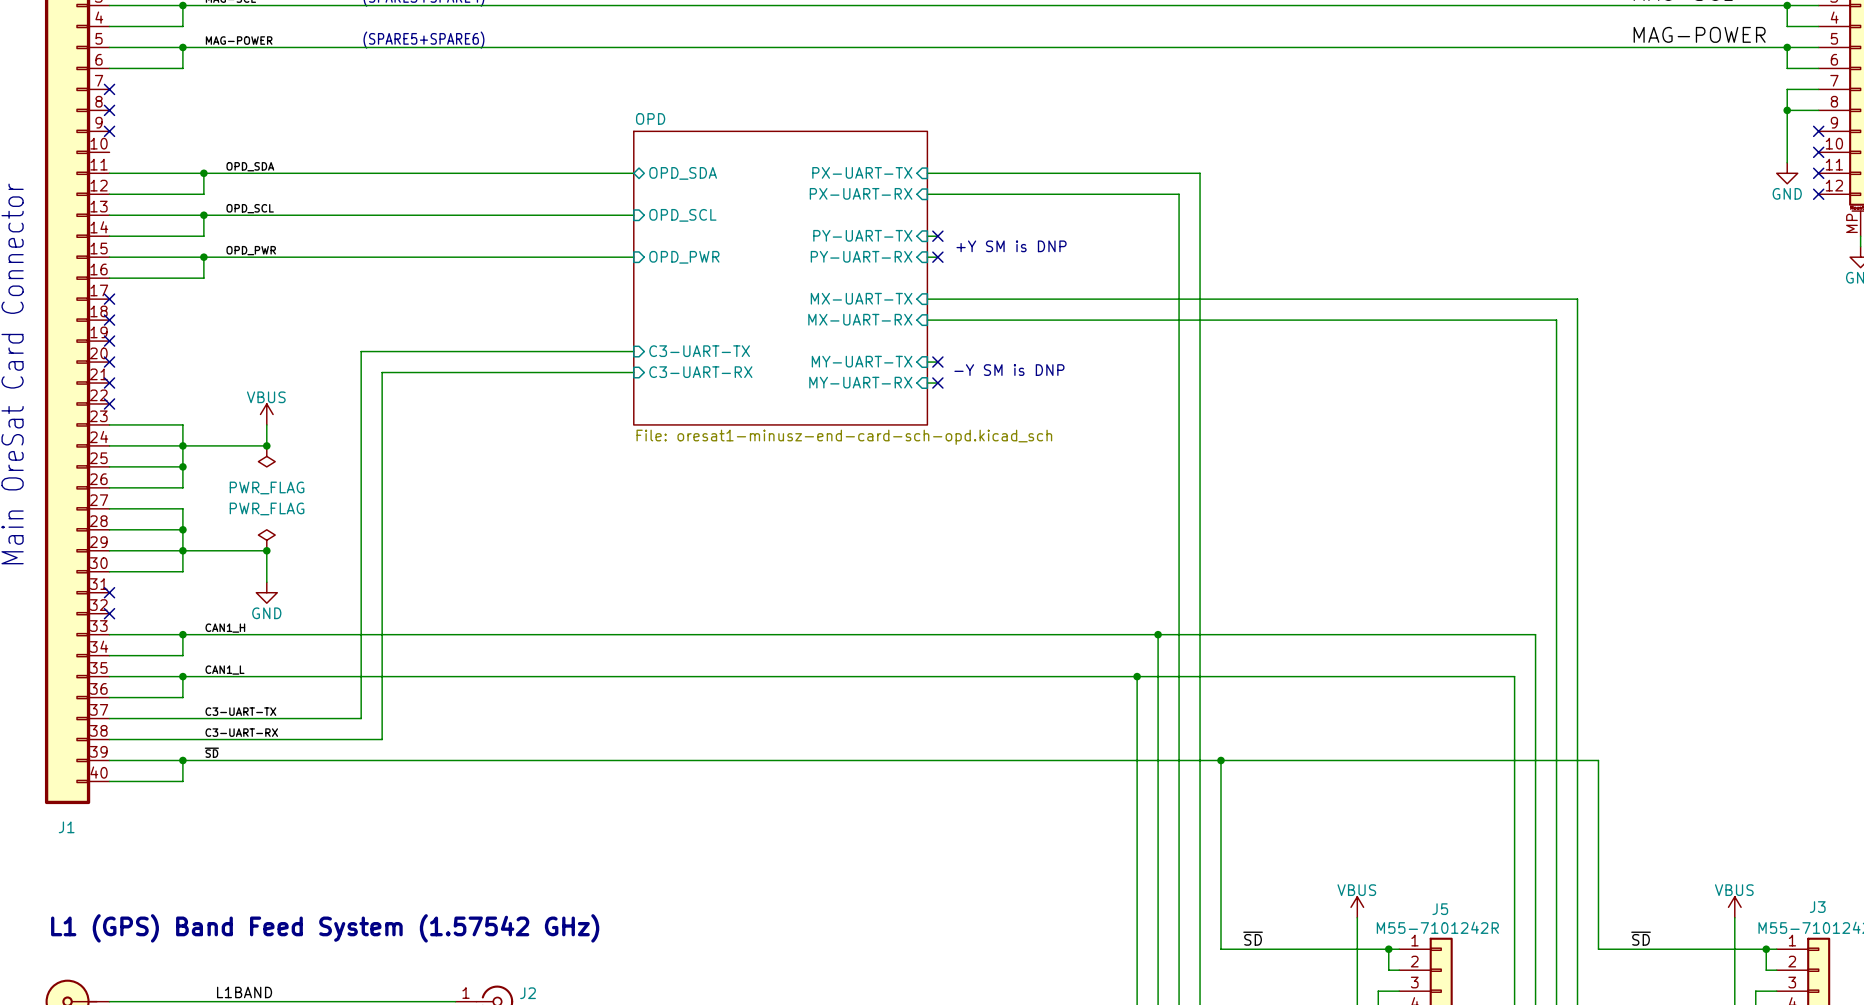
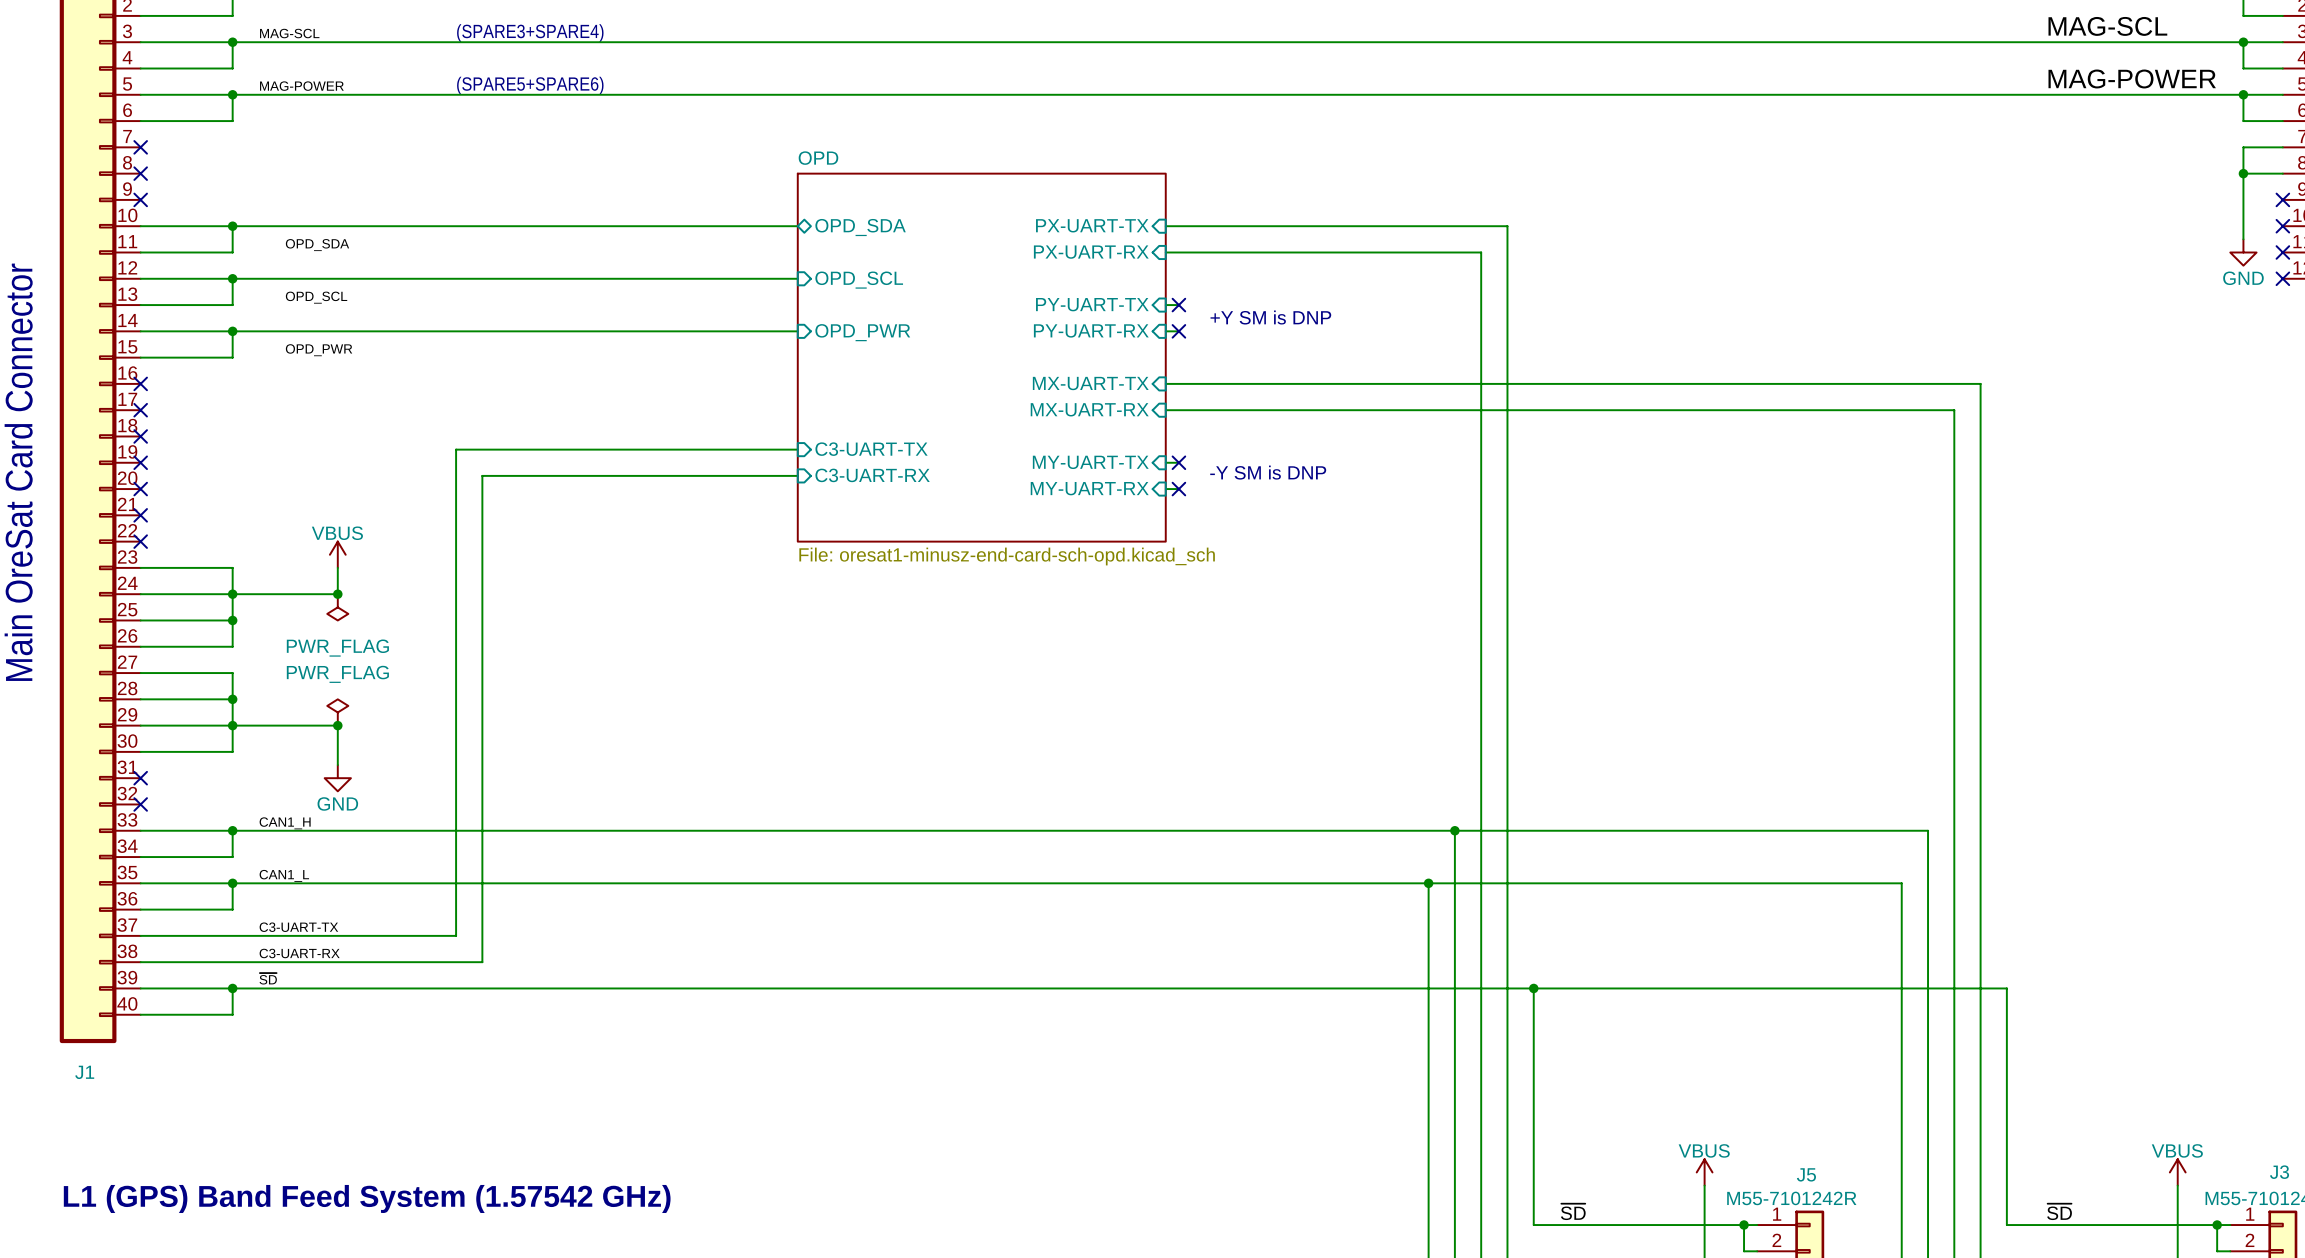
sheet pin: none -> PX-UART-TX (1092, 225)
wire: none -> (140, 226) (797, 226)
junction: none -> (232, 226)
wire: none -> (1165, 226) (1507, 226) (1507, 252)
sheet pin: PX-UART-TX (862, 172) -> PX-UART-RX (1091, 252)
wire: (182, 173) (633, 173) -> (232, 252) (232, 226)
wire: (203, 173) (203, 194) -> (797, 278) (258, 278)
junction: (203, 173) -> none
sheet pin position: OPD_SDA (683, 173) -> OPD_SDA (860, 227)
wire: (1179, 173) (1200, 173) -> (1481, 252) (1481, 278)
sheet pin: PX-UART-RX (861, 193) -> PY-UART-TX (1092, 304)
junction: none -> (232, 278)
wire: (927, 194) (1179, 194) -> none
wire: (182, 215) (633, 215) -> (232, 305) (232, 278)
wire: (203, 215) (203, 236) -> (797, 331) (258, 331)
junction: (203, 215) -> none
sheet pin position: OPD_SCL (682, 215) -> OPD_SCL (859, 280)
no-connect mark: none -> (1178, 305)
sheet pin: PY-UART-TX (862, 235) -> PY-UART-RX (1091, 330)
junction: none -> (232, 331)
text position: +Y SM is DNP (1011, 246) -> +Y SM is DNP (1270, 317)
sheet pin: PY-UART-RX (861, 256) -> MX-UART-TX (1090, 383)
wire: (182, 257) (633, 257) -> (232, 357) (232, 331)
wire: (203, 257) (203, 278) (109, 278) -> none
junction: (203, 257) -> none
sheet pin position: OPD_PWR (684, 257) -> OPD_PWR (862, 332)
wire: (927, 257) (937, 257) -> (1165, 305) (1178, 305)
no-connect mark: (937, 257) -> none
no-connect mark: none -> (140, 383)
sheet OPD position: (780, 278) -> (981, 357)
wire: none -> (1165, 383) (1980, 383) (1980, 410)
sheet pin: MX-UART-TX (861, 298) -> MX-UART-RX (1089, 409)
wire: (1556, 299) (1577, 299) -> (1954, 410) (1954, 436)
sheet pin: MX-UART-RX (860, 319) -> MY-UART-TX (1090, 462)
wire: (927, 320) (1556, 320) -> none
wire: none -> (797, 449) (456, 449) (456, 475)
sheet pin: none -> C3-UART-TX (871, 449)
no-connect mark: none -> (1178, 462)
wire: (361, 351) (382, 351) -> (482, 502) (482, 475)
sheet pin: C3-UART-TX (699, 351) -> C3-UART-RX (872, 475)
sheet pin: MY-UART-TX (862, 361) -> MY-UART-RX (1089, 488)
text position: -Y SM is DNP (1009, 370) -> -Y SM is DNP (1268, 472)
wire: (382, 372) (633, 372) -> none
sheet pin: C3-UART-RX (700, 372) -> none
sheet pin: MY-UART-RX (860, 382) -> none
wire: (927, 383) (937, 383) -> (1165, 462) (1178, 462)
no-connect mark: (937, 383) -> none

